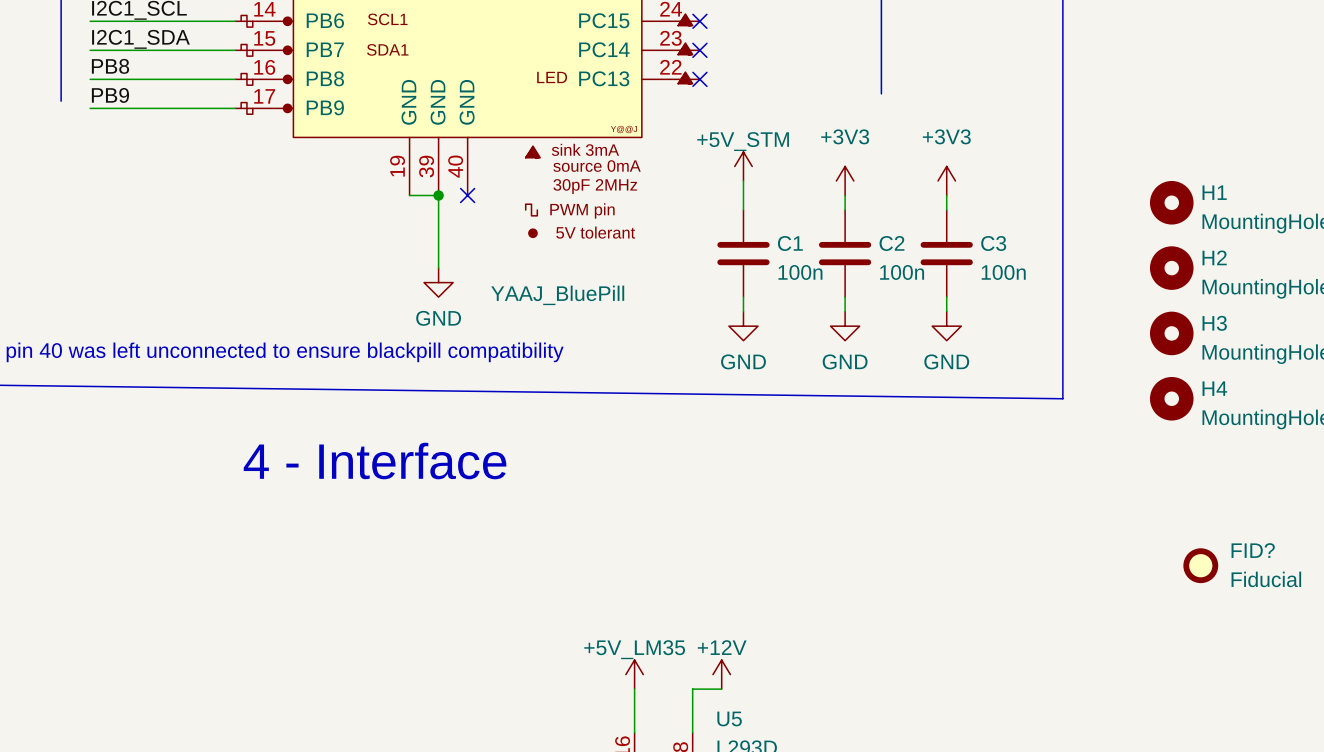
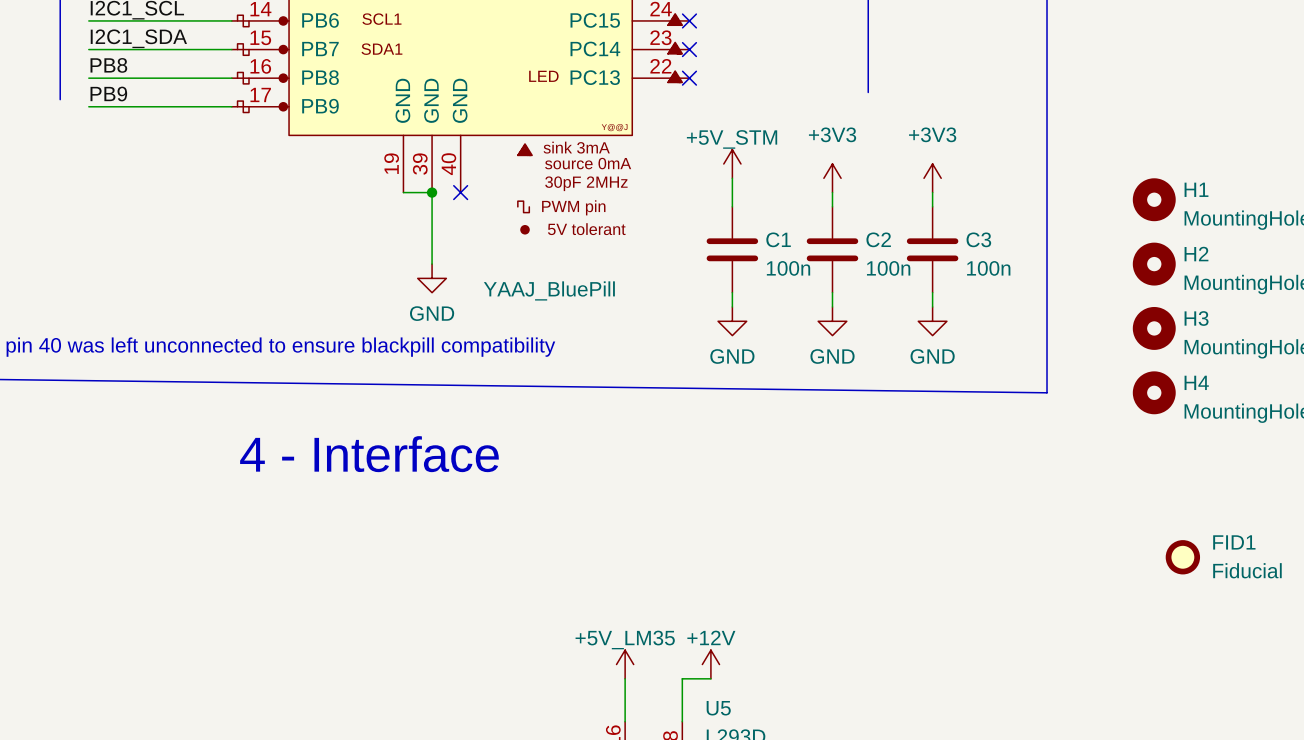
FID? name: FID? (1253, 550) -> FID1 (1234, 542)

